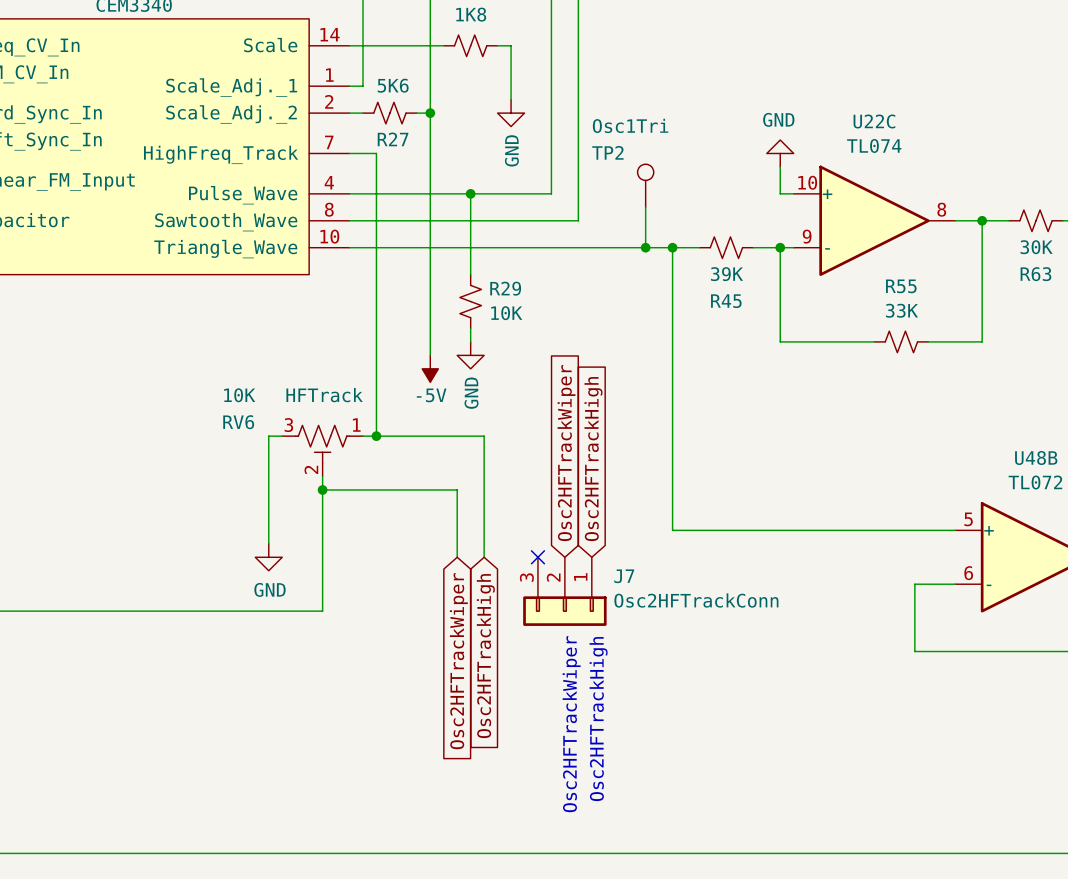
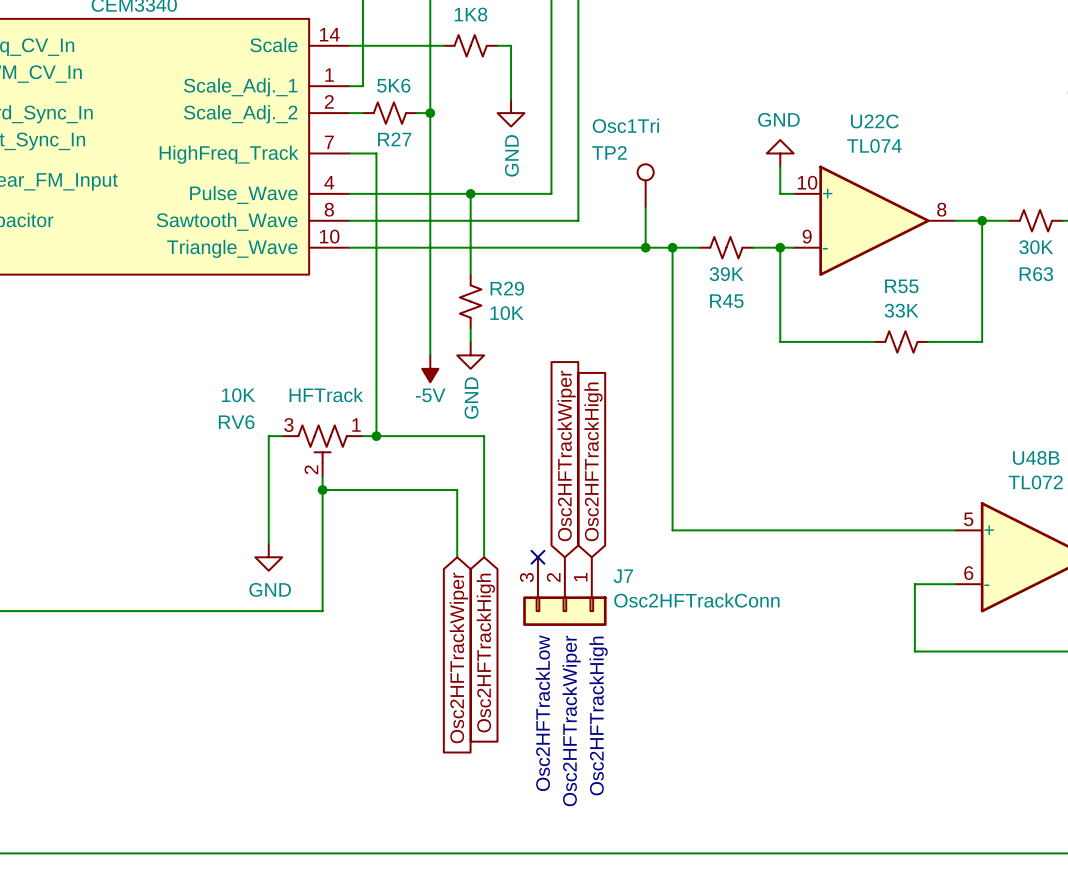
text: none -> Osc2HFTrackLow (542, 713)

